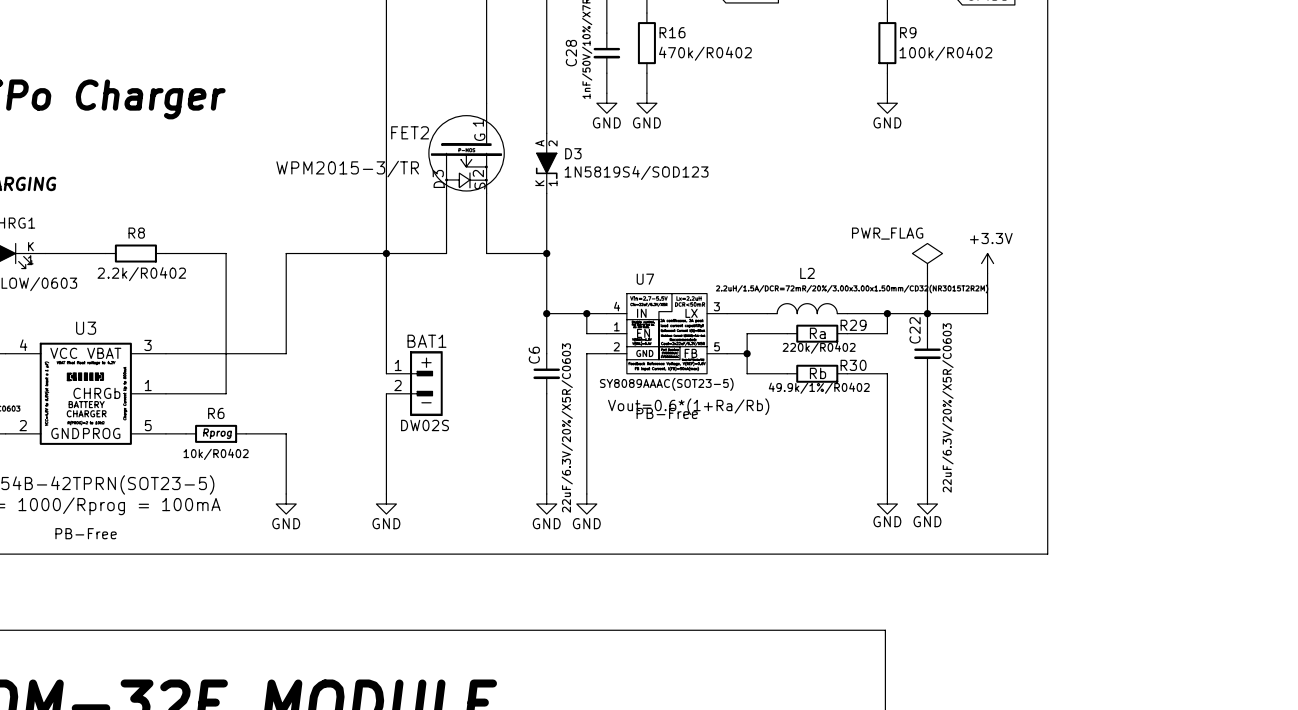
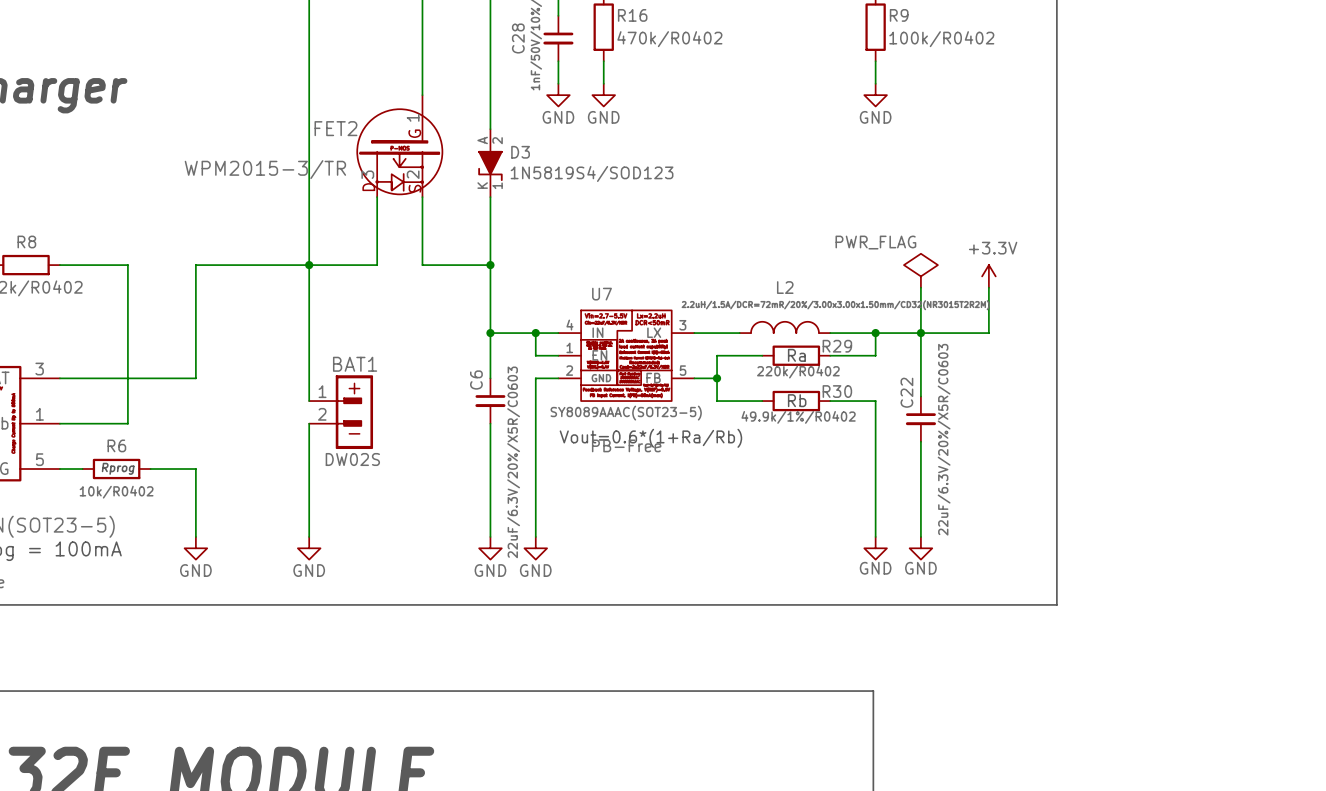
C22 position: (927, 353) -> (920, 419)

